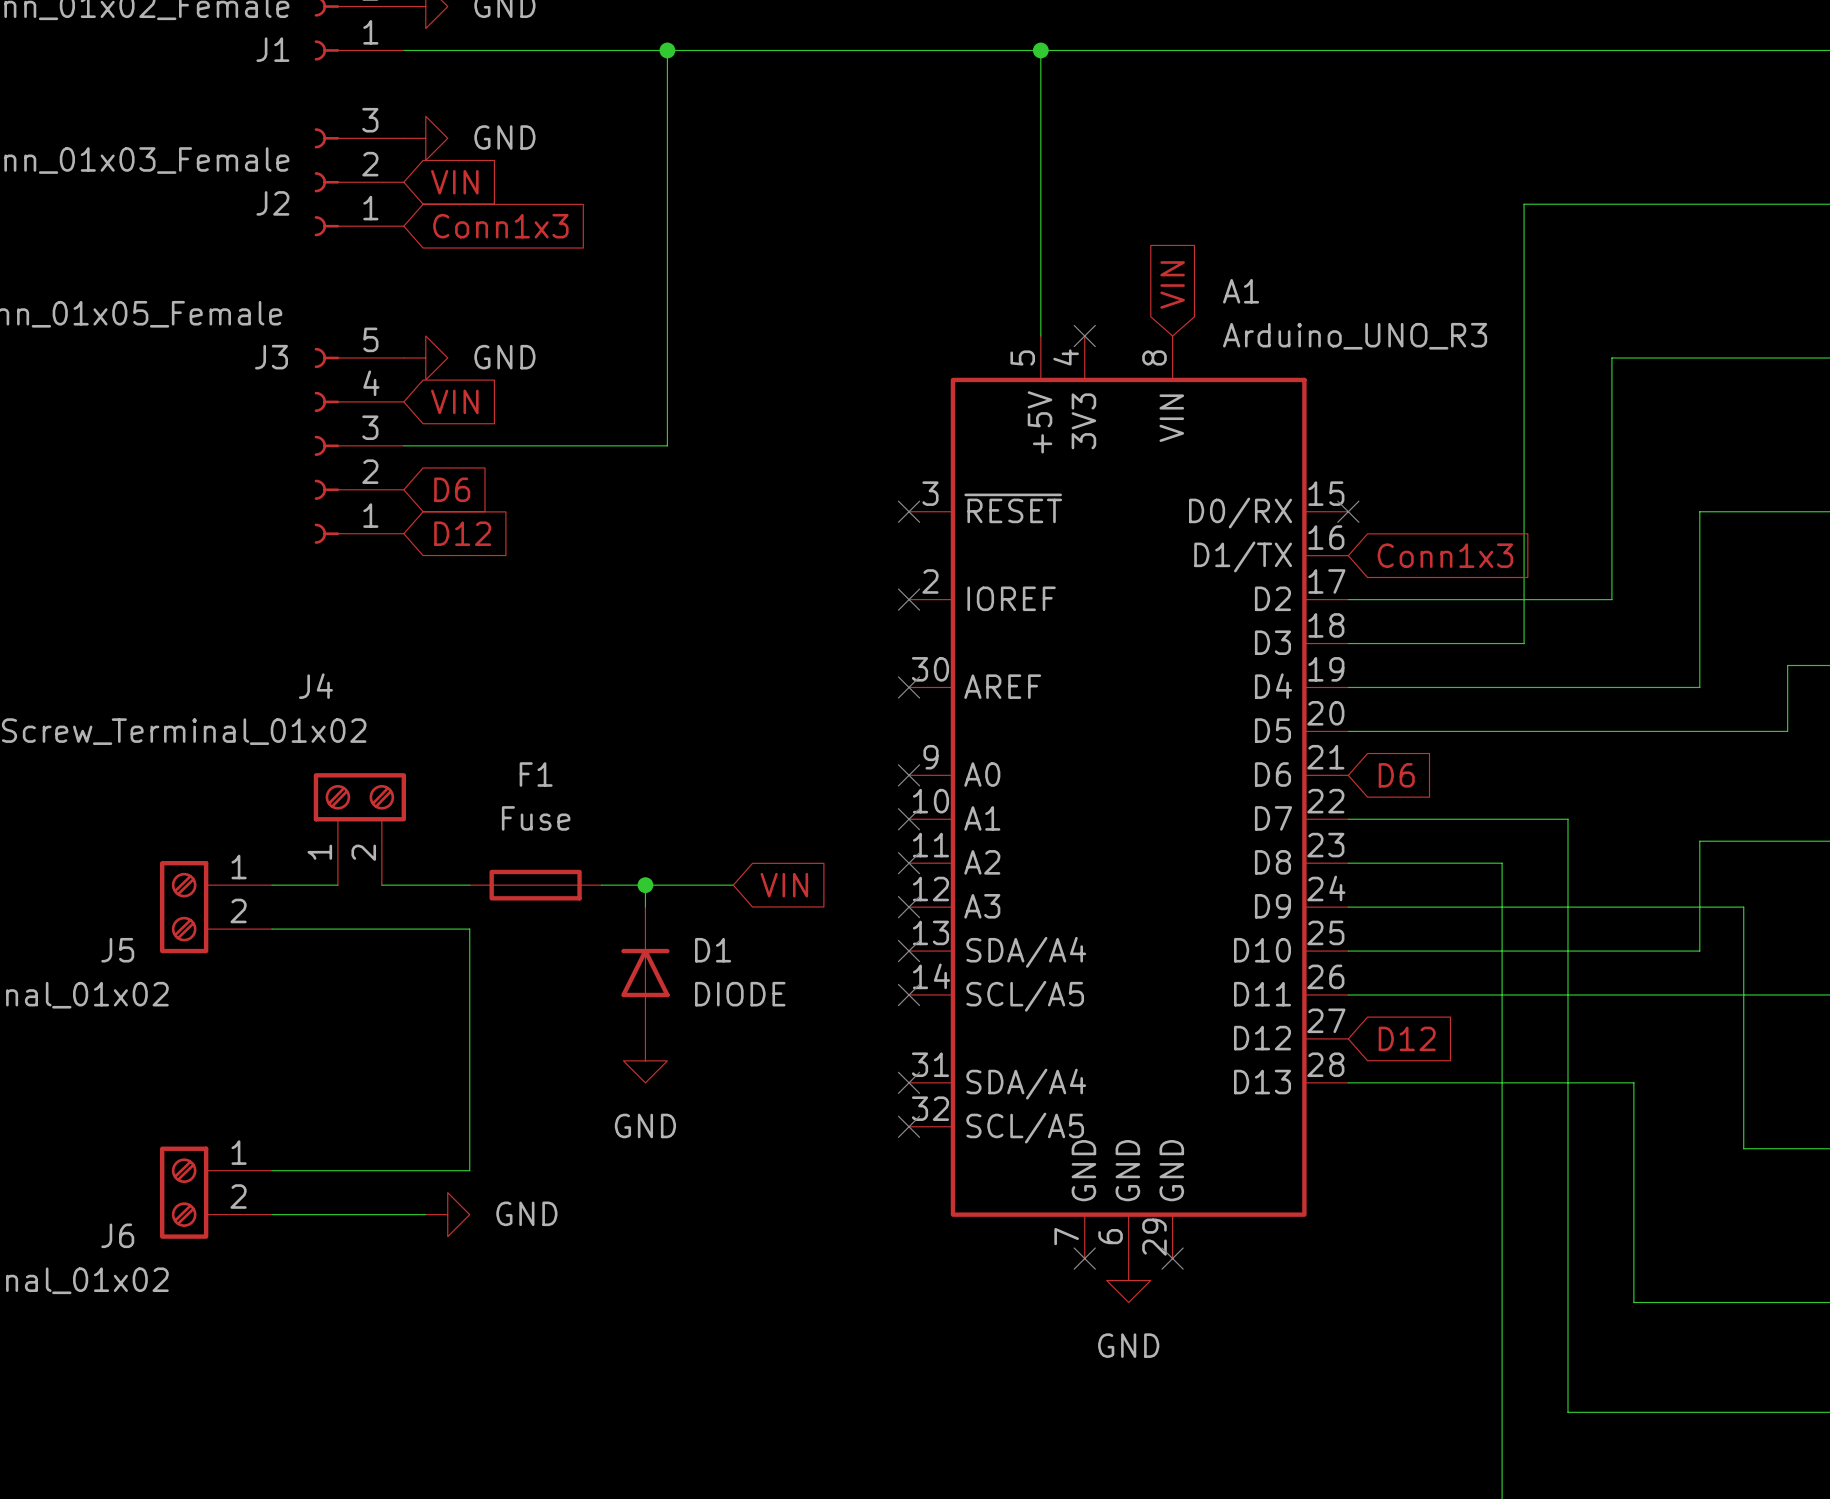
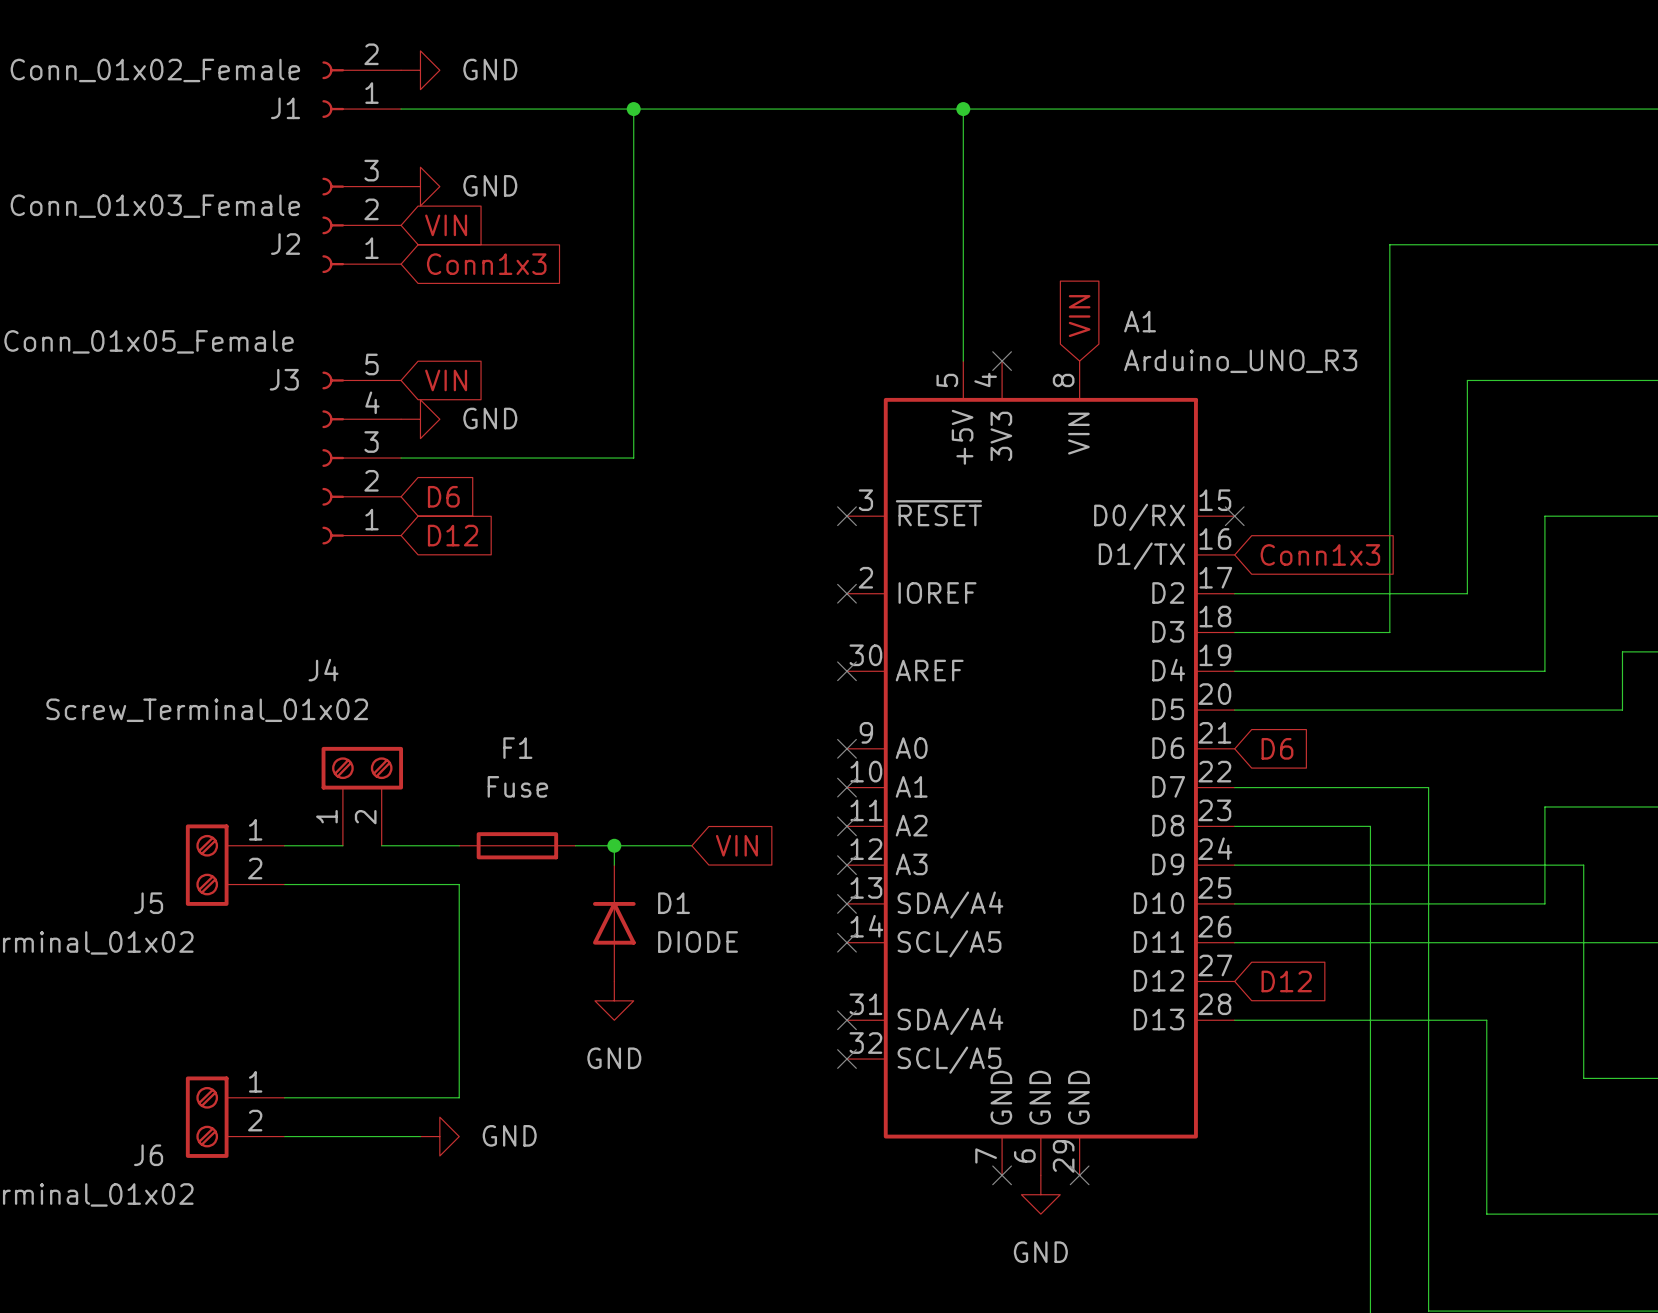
power symbol position: GND (425, 357) -> GND (420, 419)
global label position: VIN (454, 401) -> VIN (446, 380)

